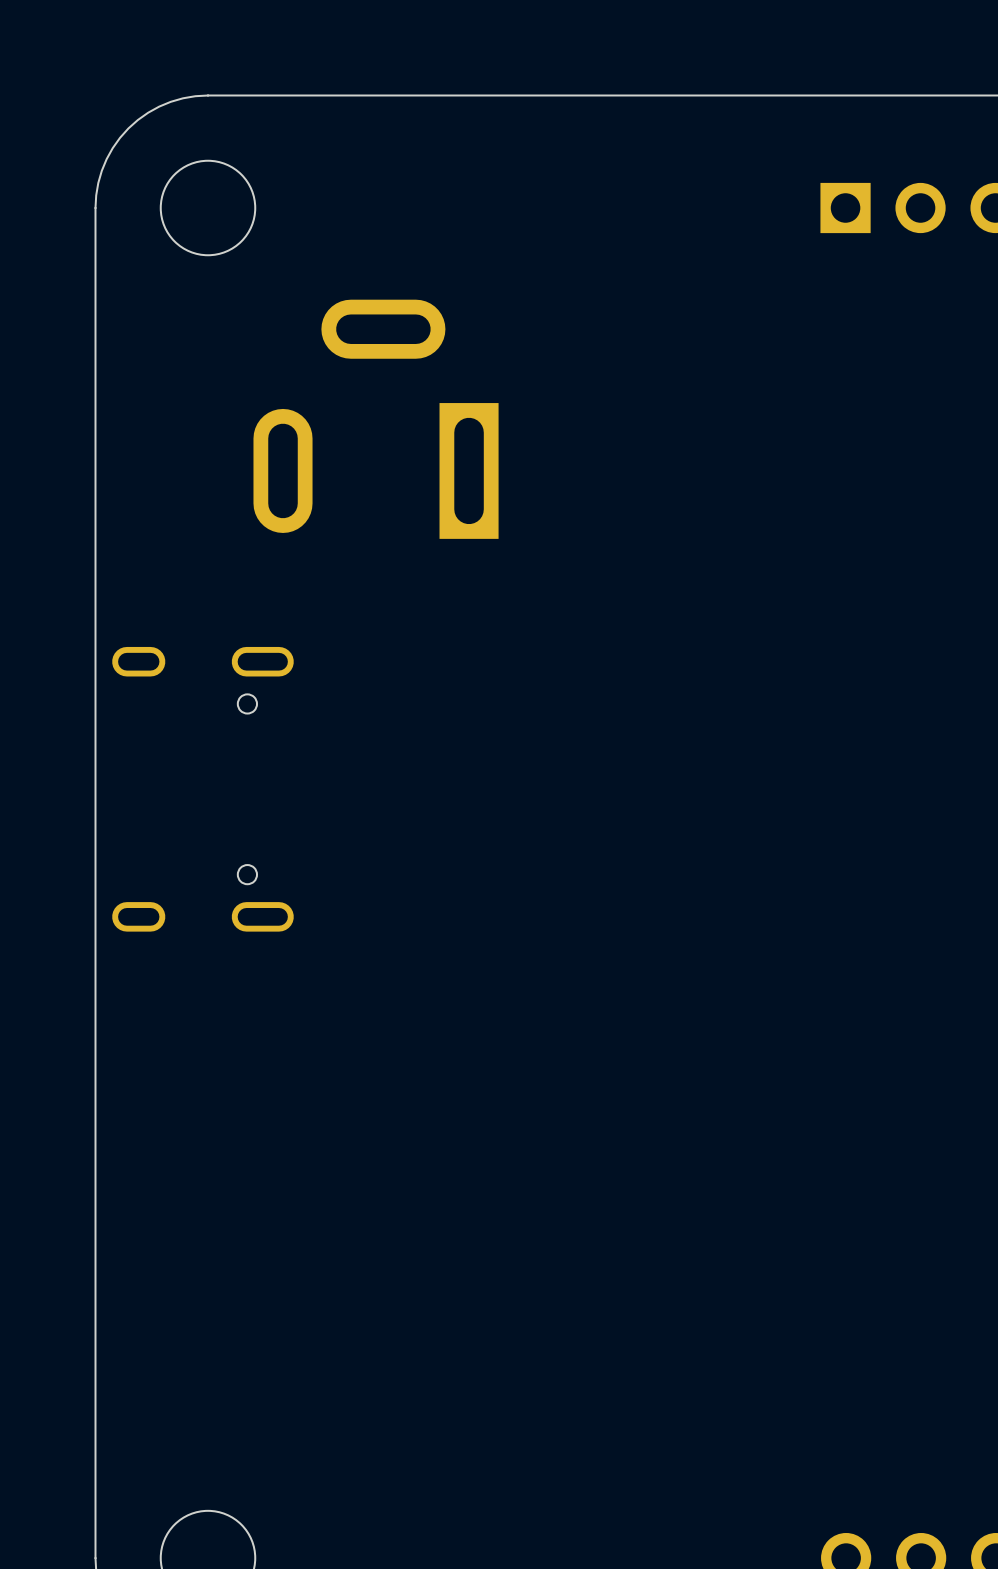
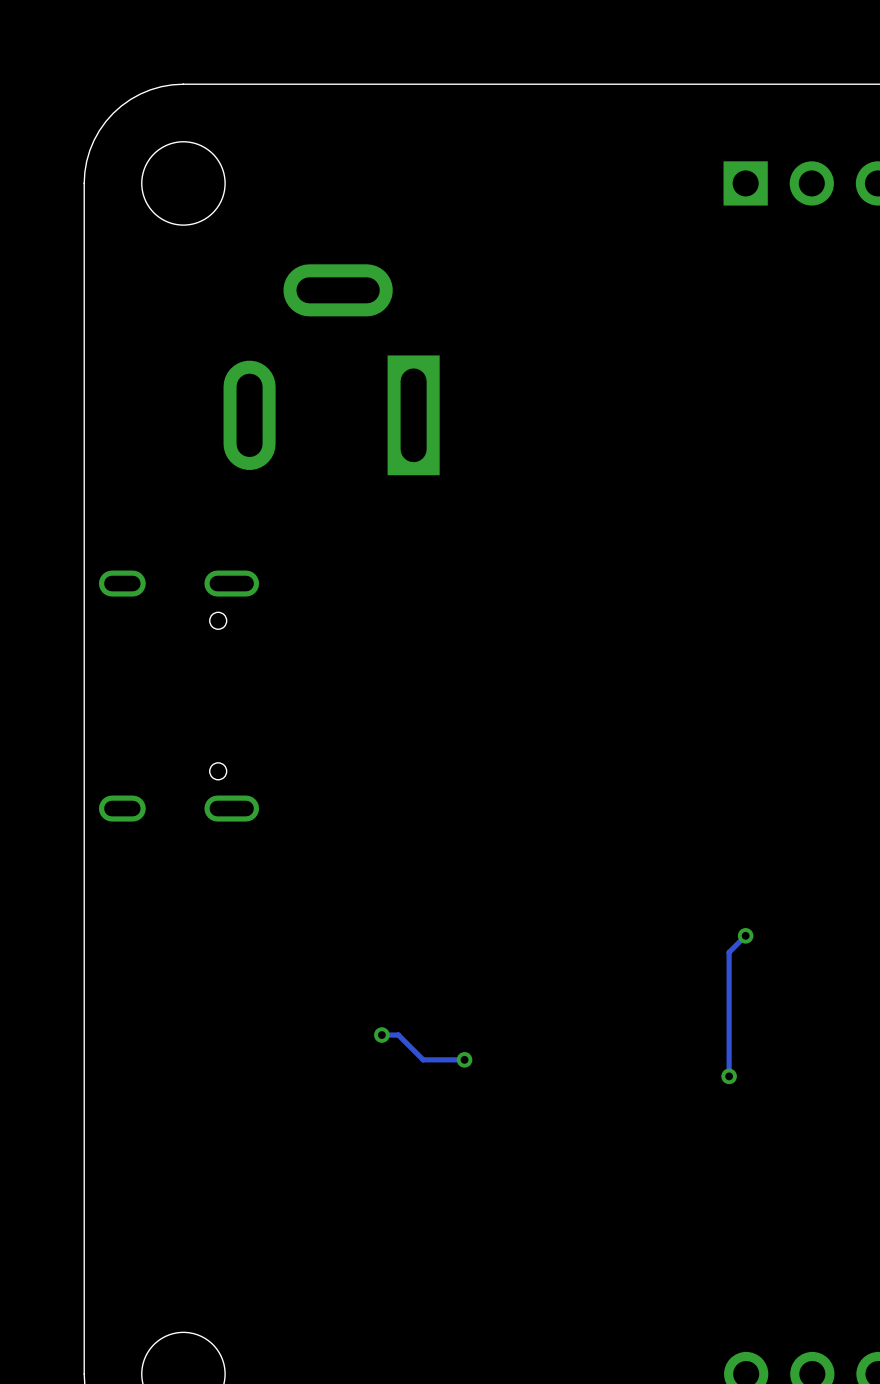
track: none -> (745, 935) (729, 952) (729, 1076)
via: none -> (745, 935)
track: none -> (381, 1035) (398, 1035) (423, 1059) (464, 1059)
via: none -> (381, 1035)
via: none -> (464, 1059)
via: none -> (729, 1076)

